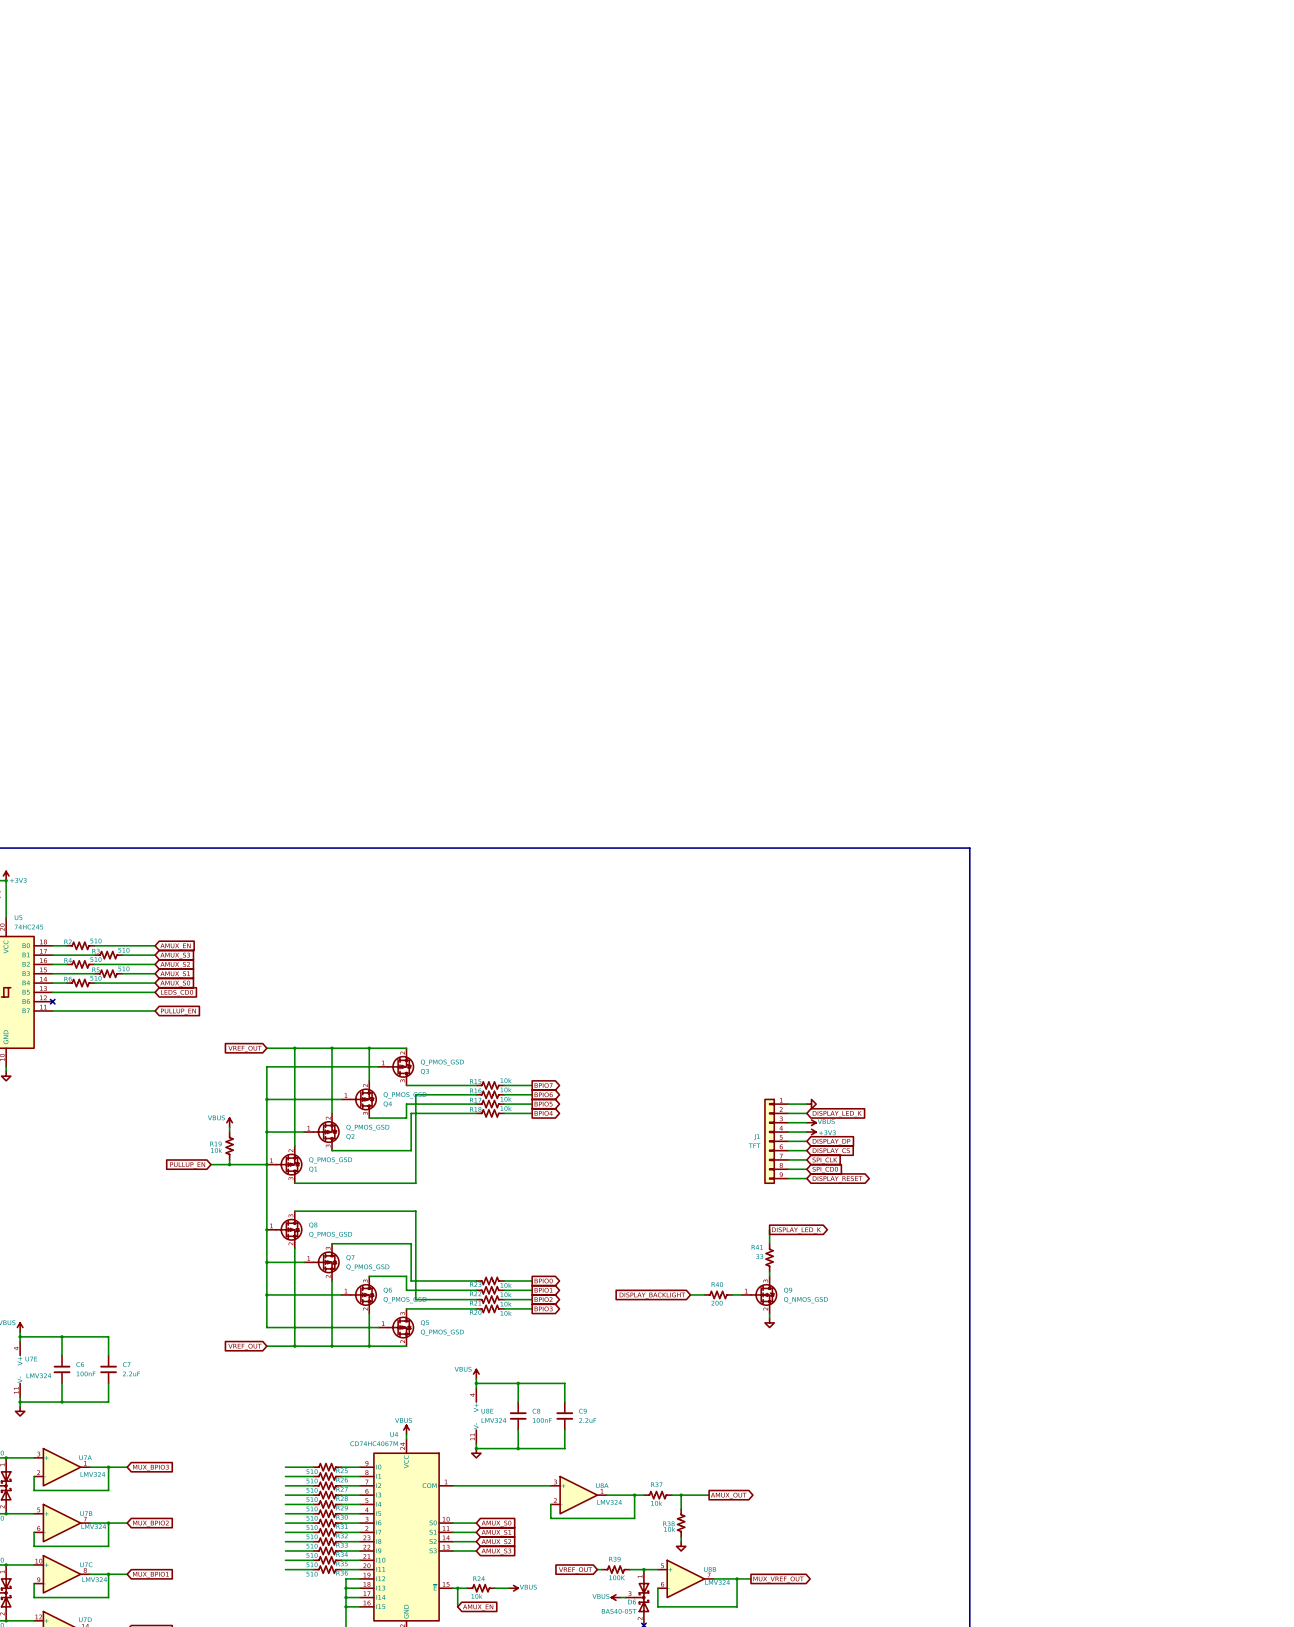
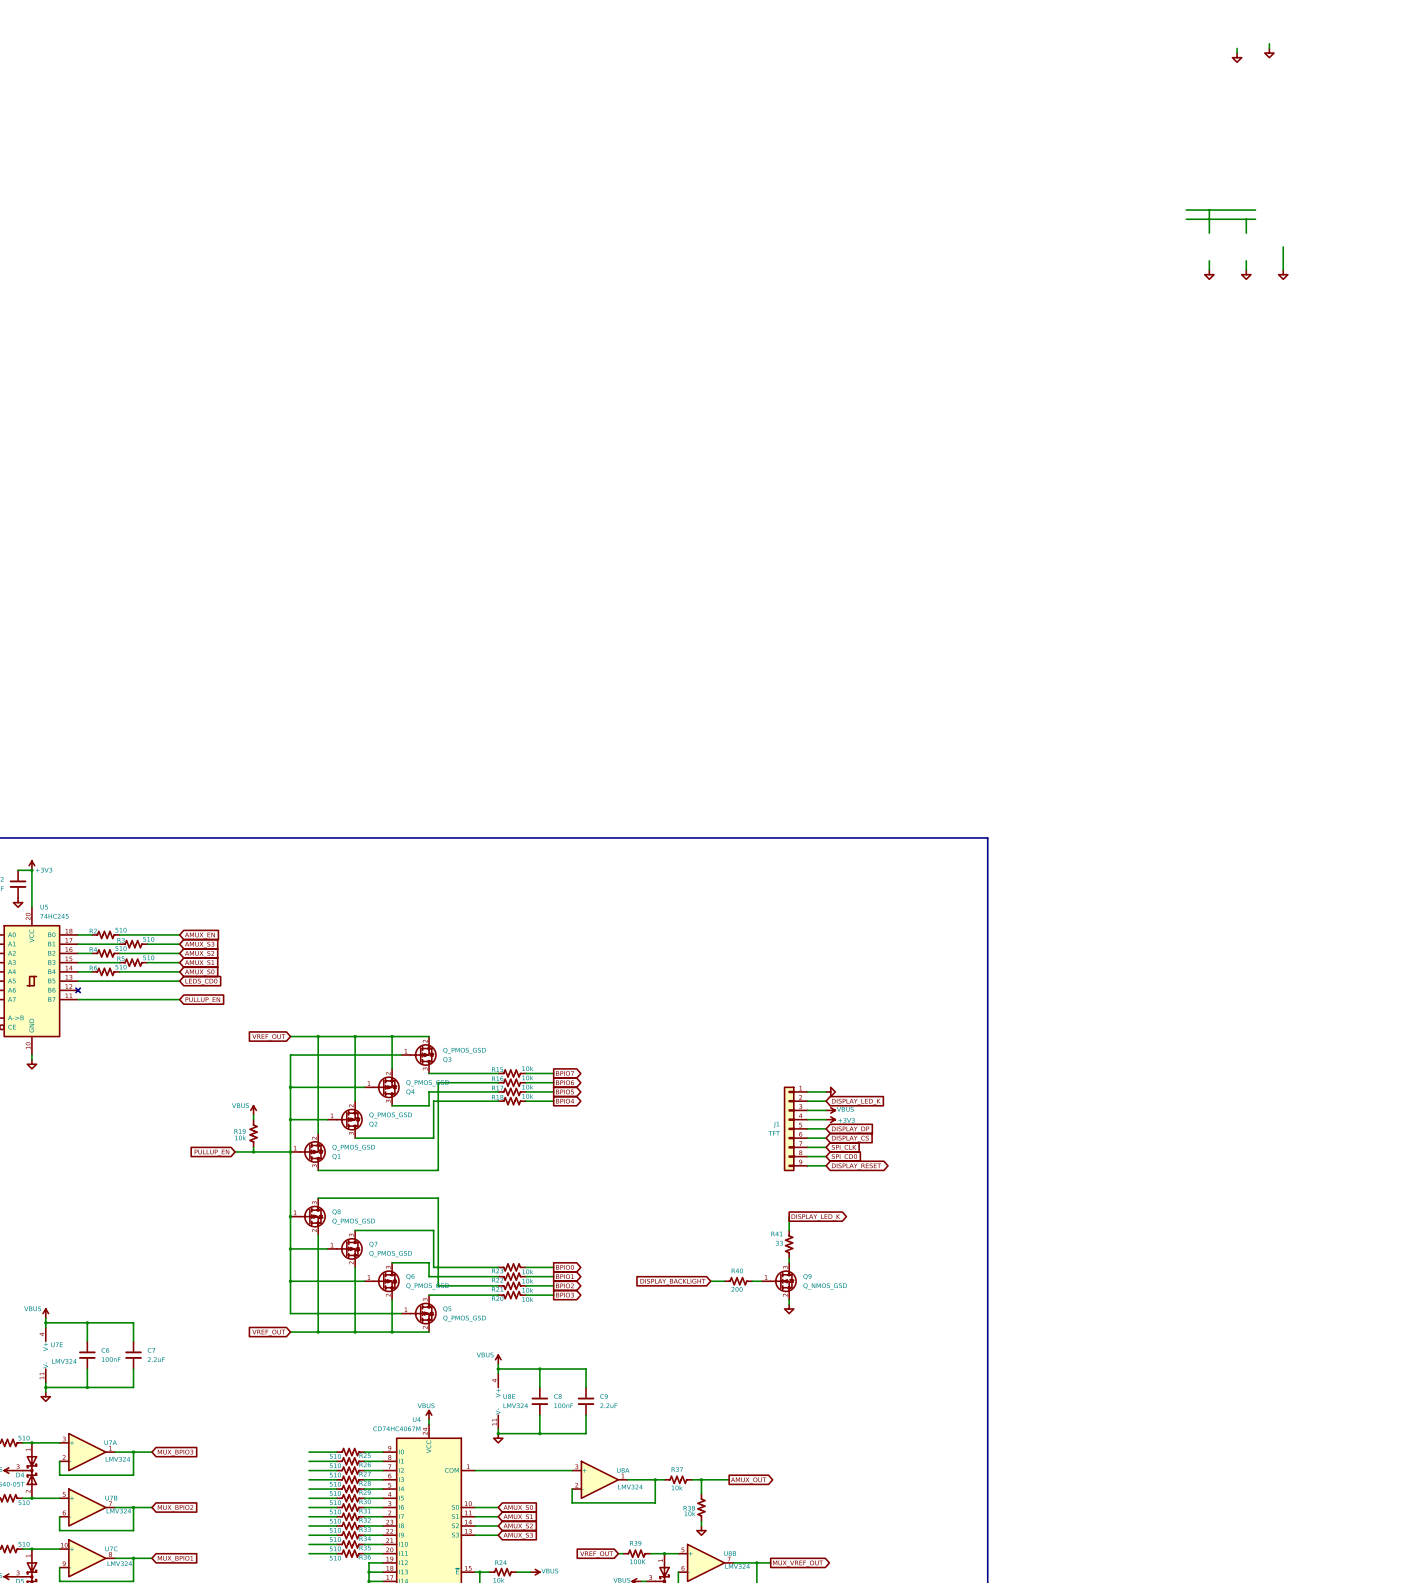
wire: none -> (1269, 43) (1269, 48)
wire: none -> (1237, 48) (1237, 53)
power symbol: none -> (1269, 53)
power symbol: none -> (1237, 57)
wire: none -> (1186, 210) (1255, 210)
wire: none -> (1209, 210) (1209, 233)
wire: none -> (1186, 219) (1255, 219)
wire: none -> (1246, 219) (1246, 233)
wire: none -> (1283, 246) (1283, 270)
wire: none -> (1209, 260) (1209, 270)
wire: none -> (1246, 260) (1246, 270)
power symbol: none -> (1209, 274)
power symbol: none -> (1246, 274)
power symbol: none -> (1283, 274)

